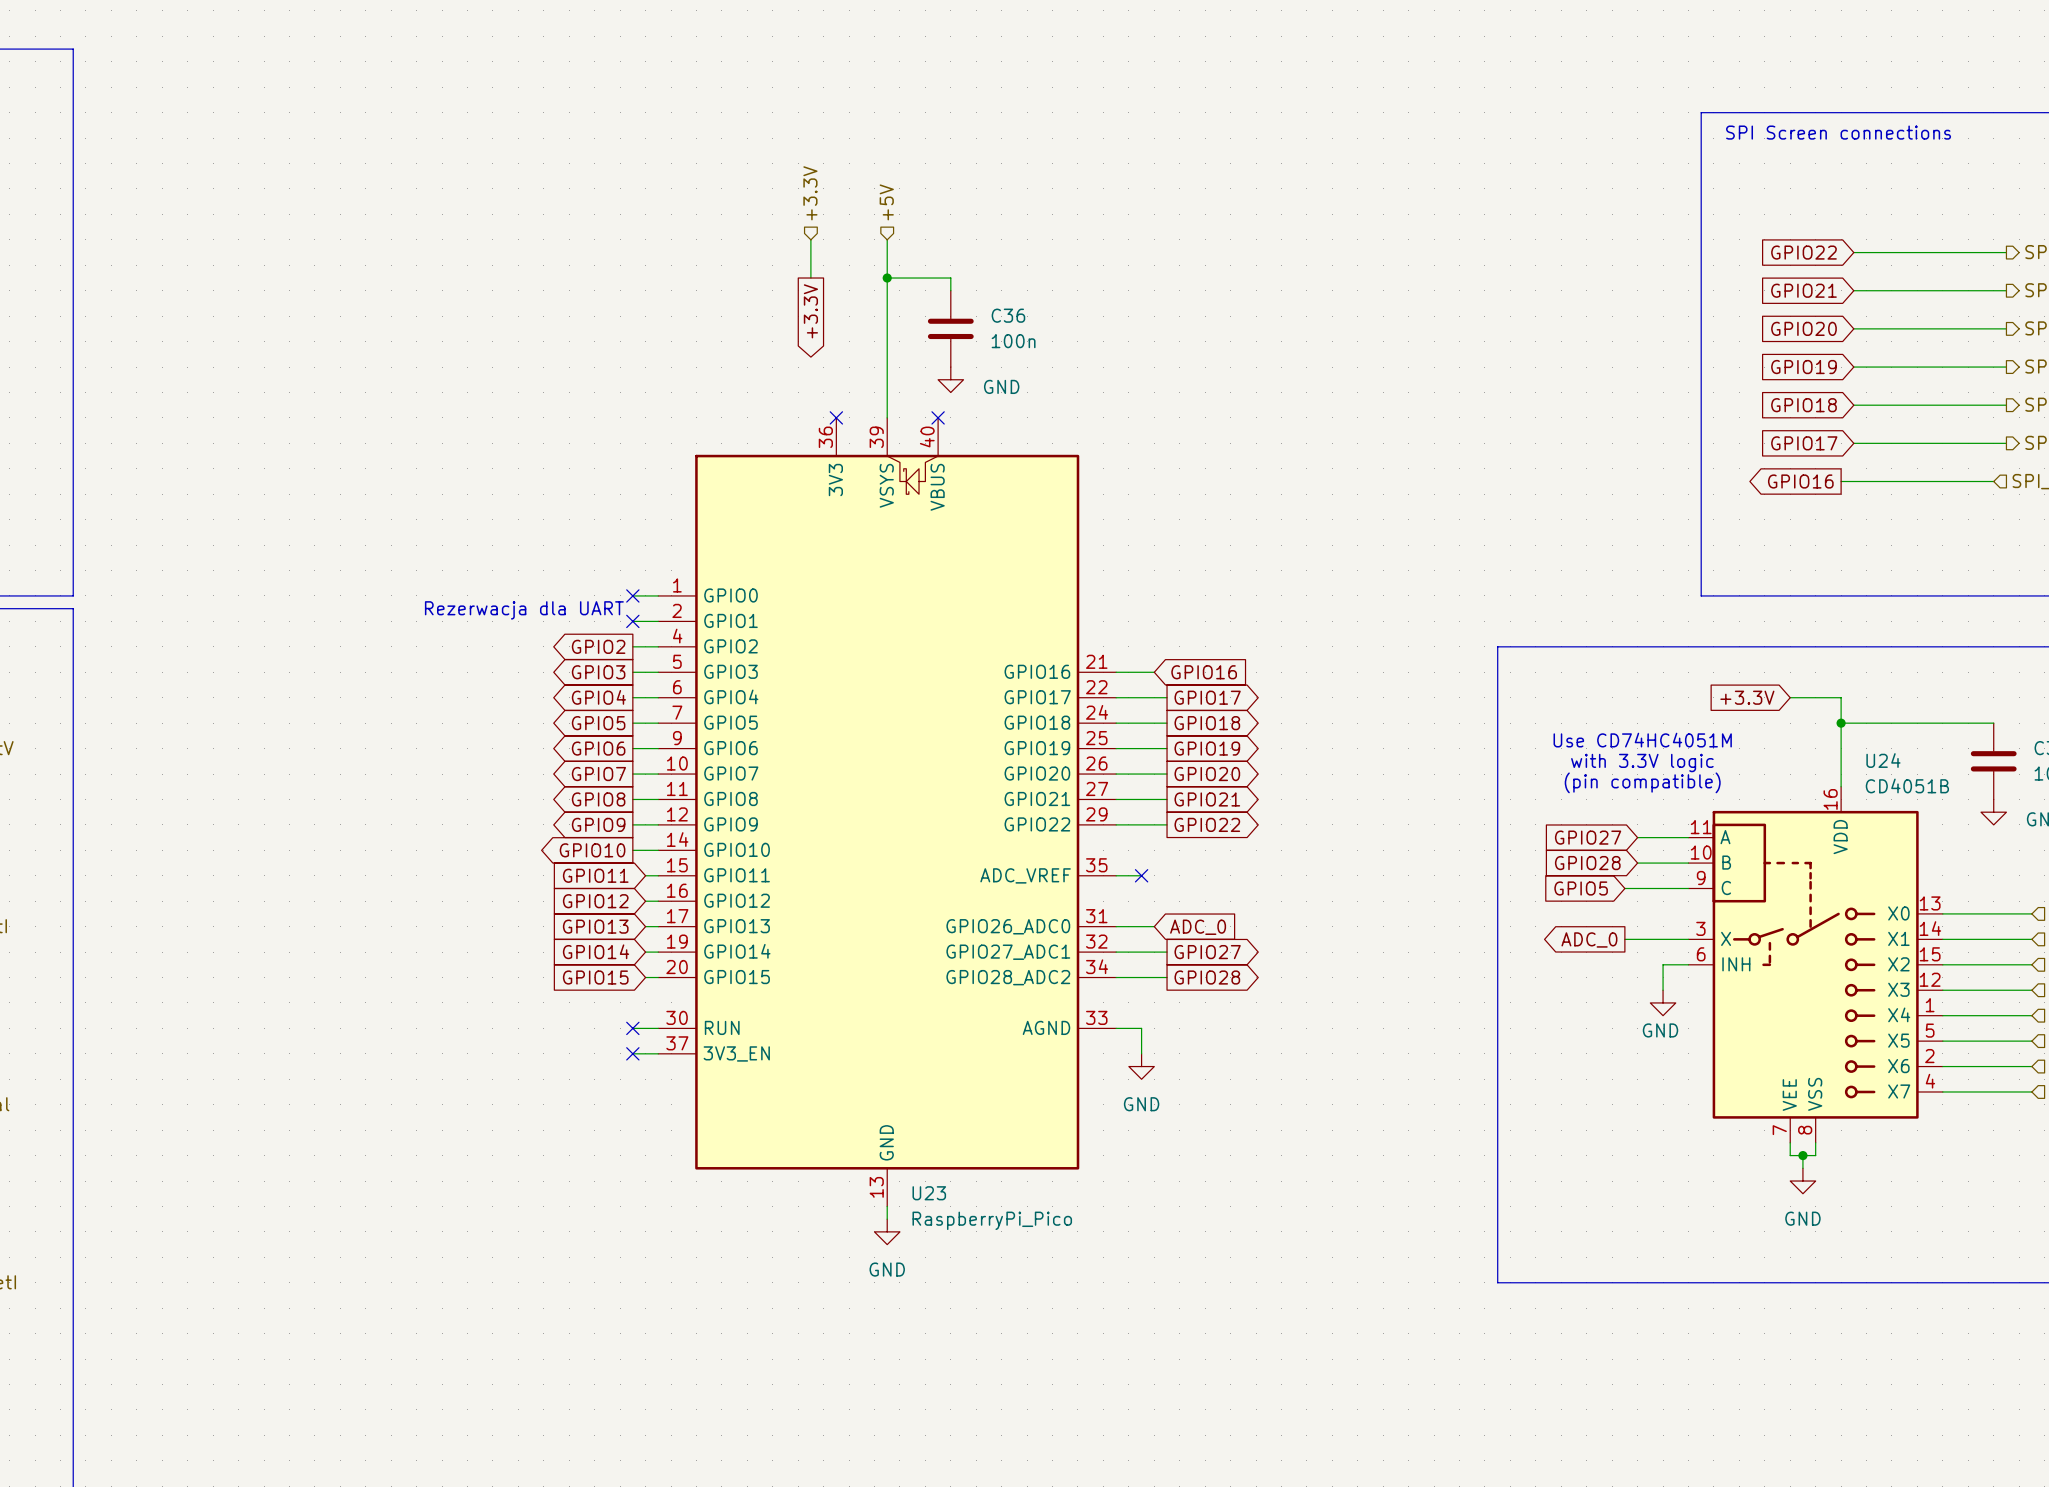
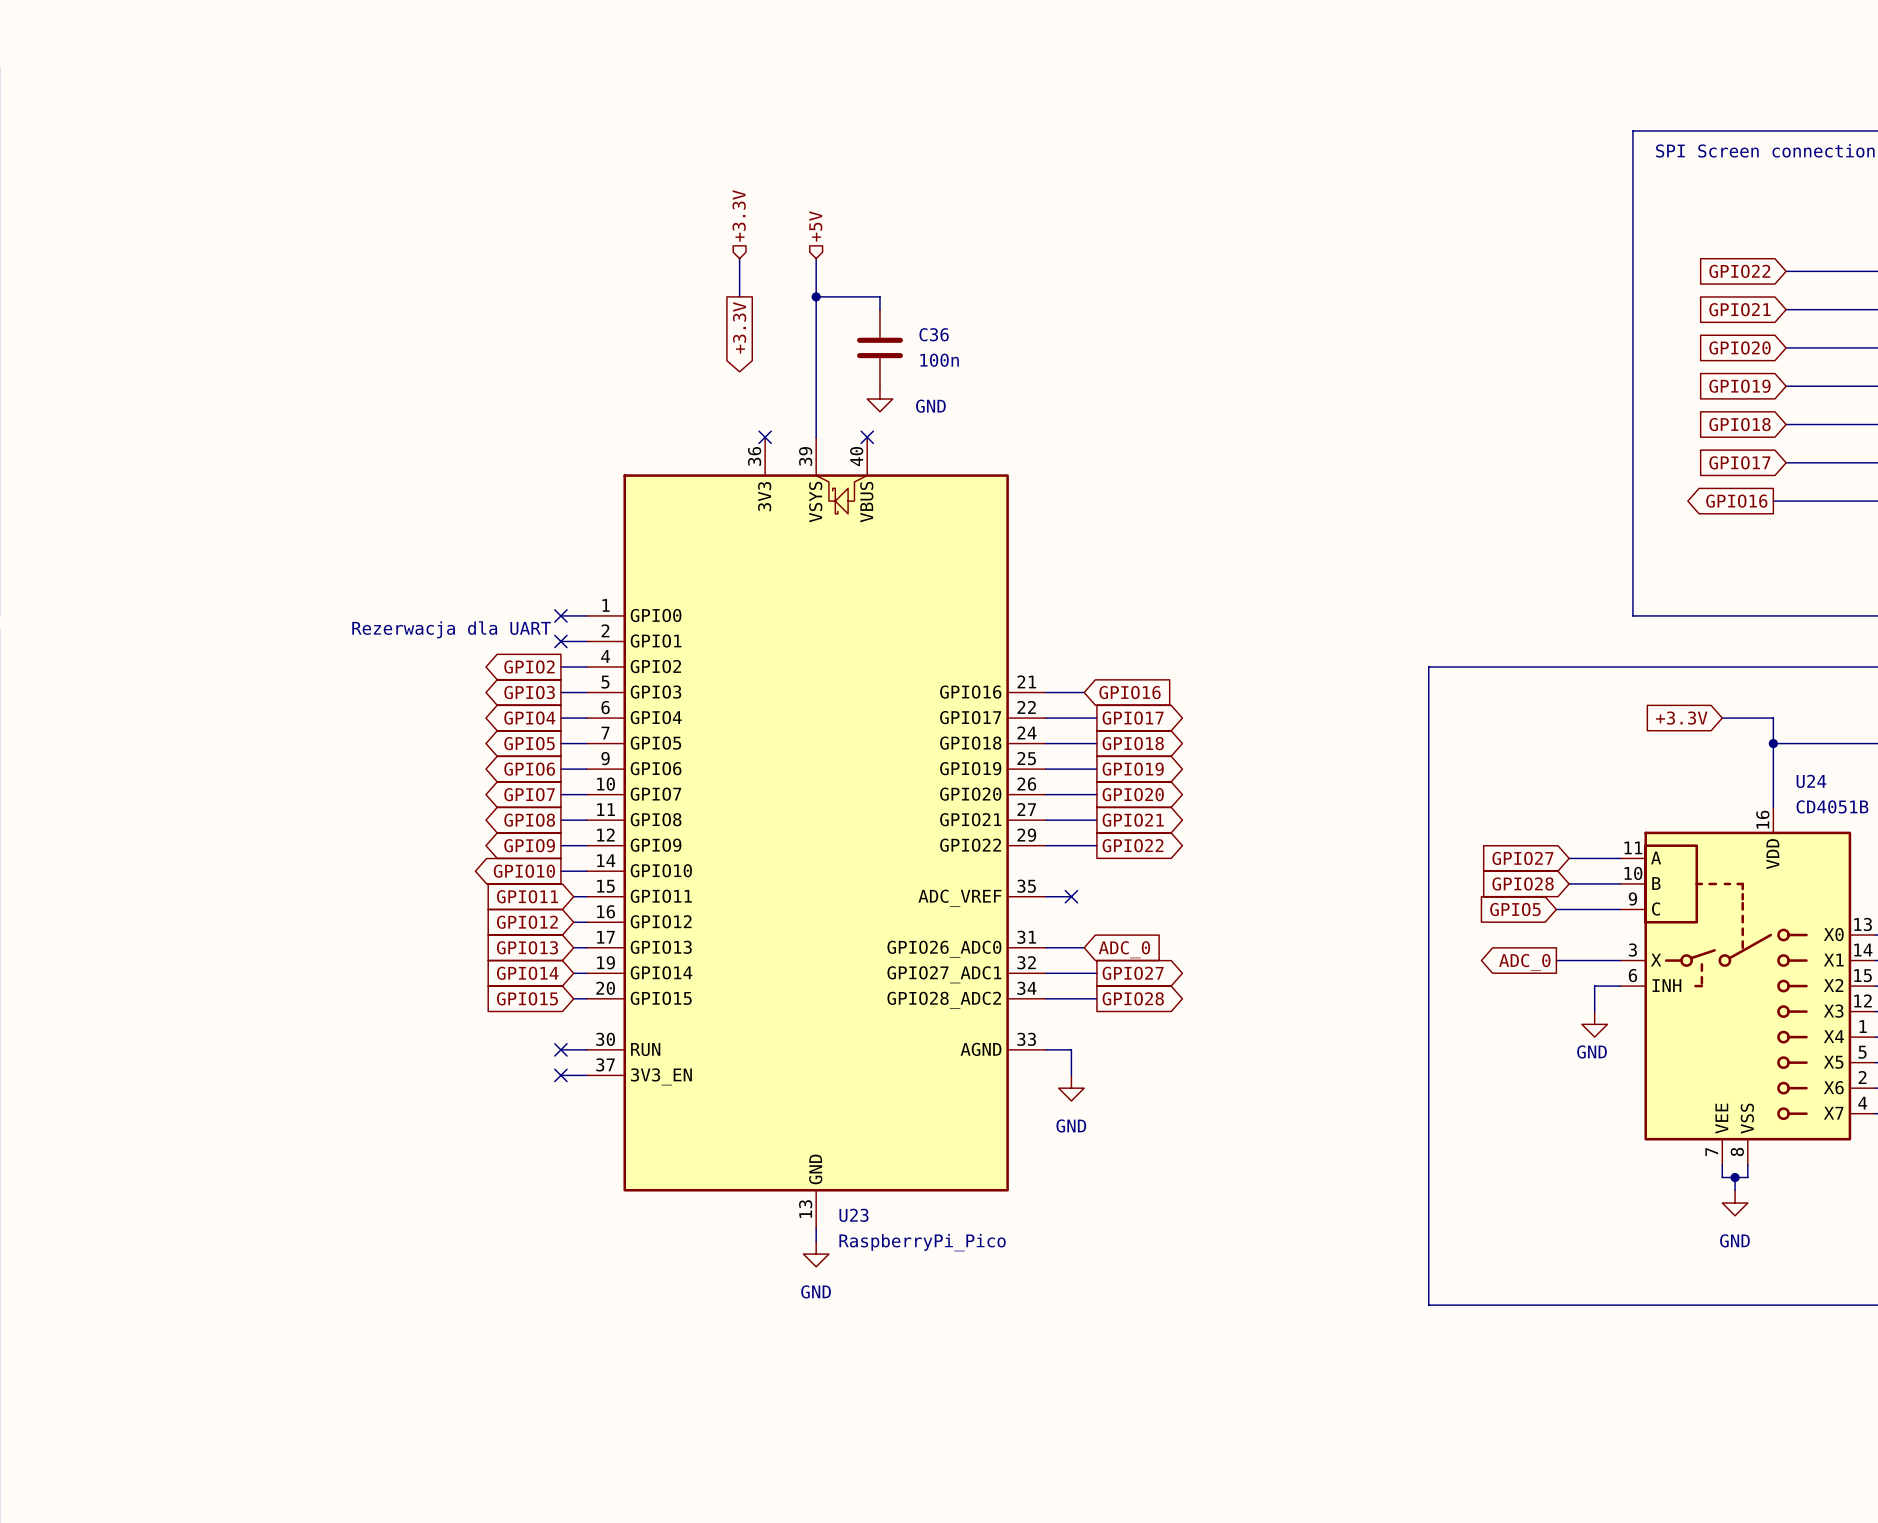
text: Use CD74HC4051M (1642, 740) -> none
text: with 3.3V logic (1642, 762) -> none
text: (pin compatible) (1642, 782) -> none

